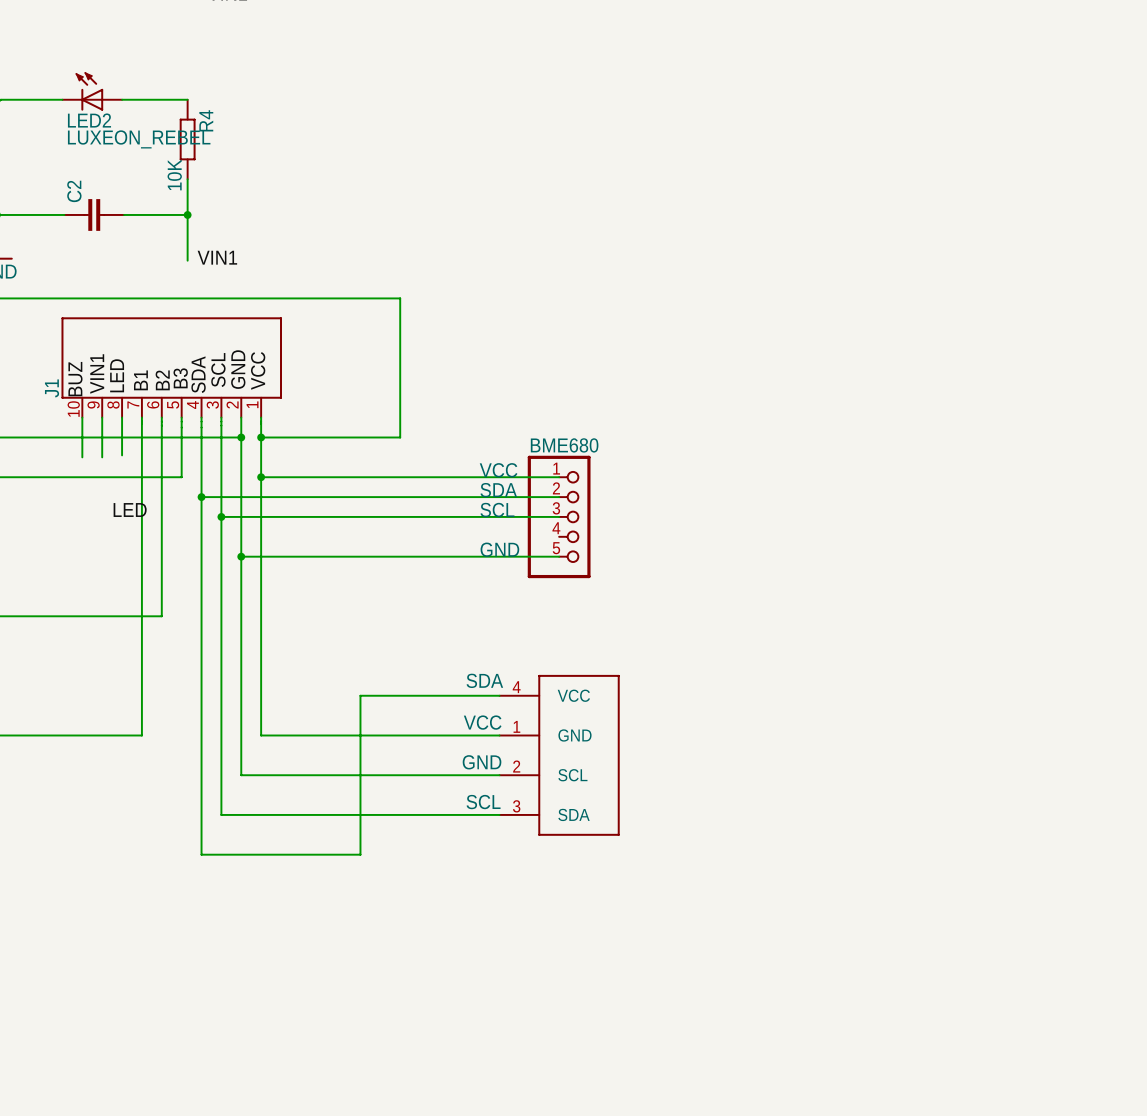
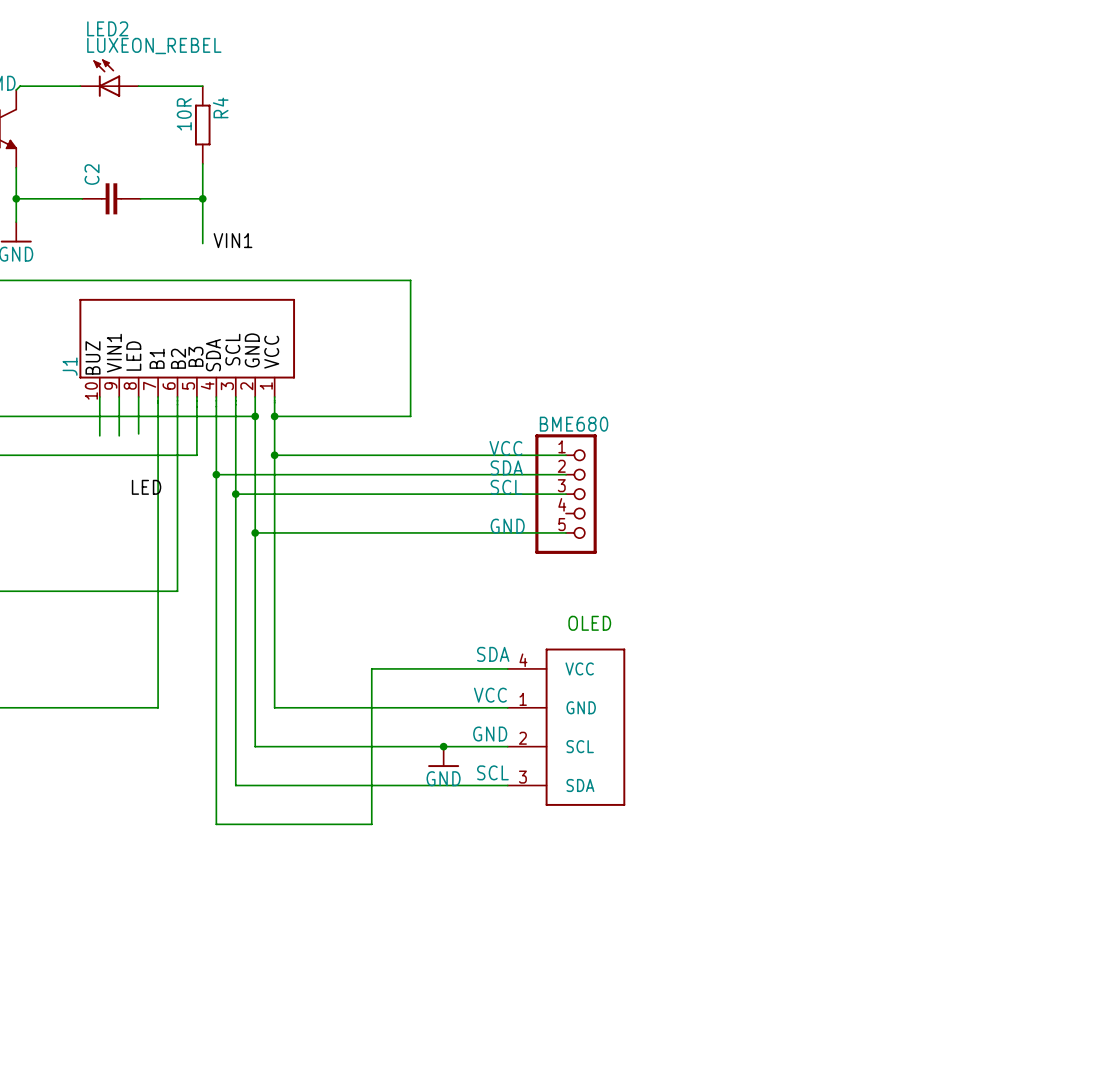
LED2 name position: LED2 (89, 120) -> LED2 (107, 28)
R4 value: none -> 10R (184, 114)
LED2 value position: LUXEON_REBEL (139, 139) -> LUXEON_REBEL (154, 46)
R4 text: 10K (174, 174) -> none
text: none -> OLED (589, 623)
junction: none -> (443, 746)
power symbol: none -> GND (443, 756)

